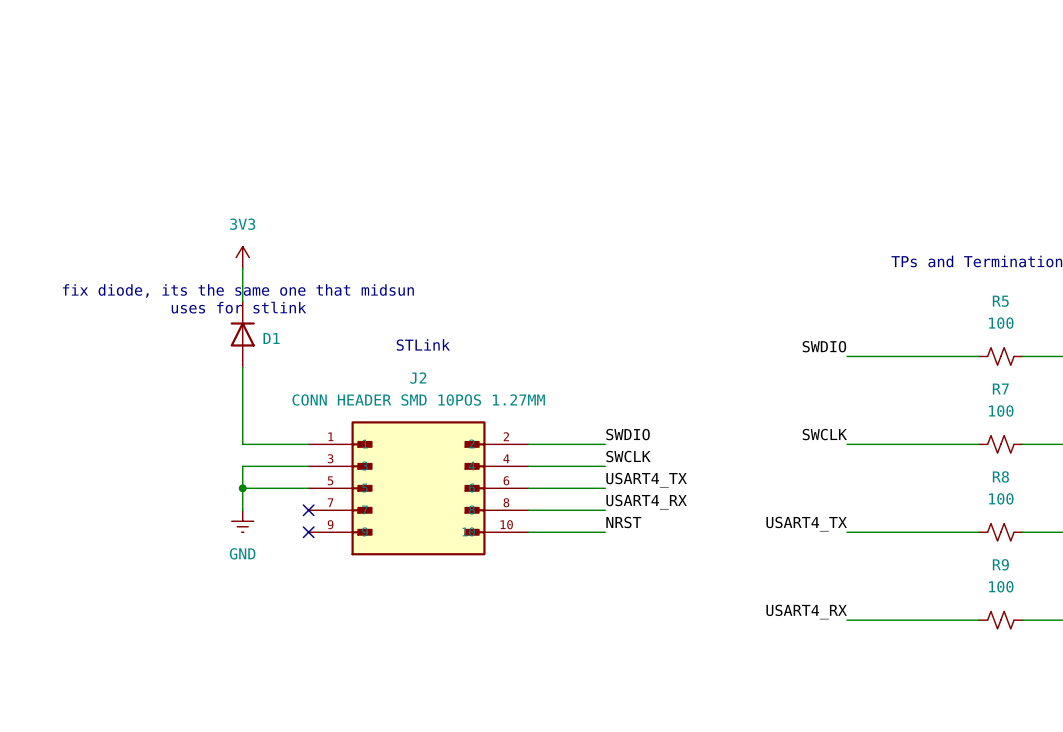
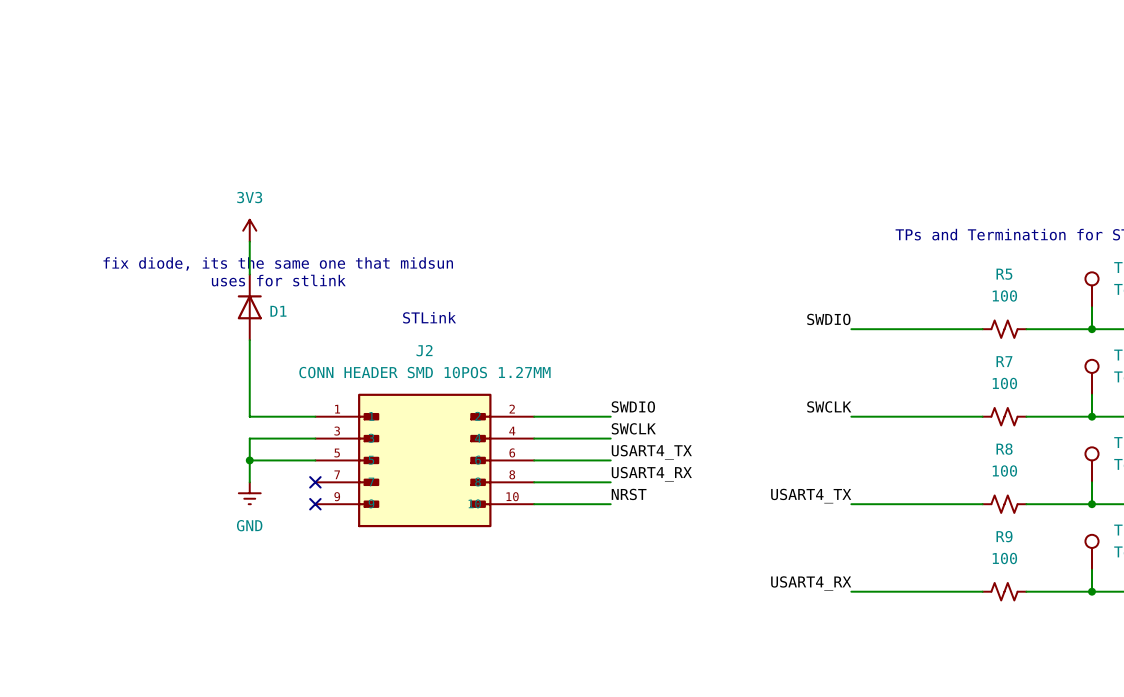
text position: fix diode, its the same one that midsun (238, 290) -> fix diode, its the same one that midsun (278, 263)
text position: uses for stlink (238, 307) -> uses for stlink (278, 280)

